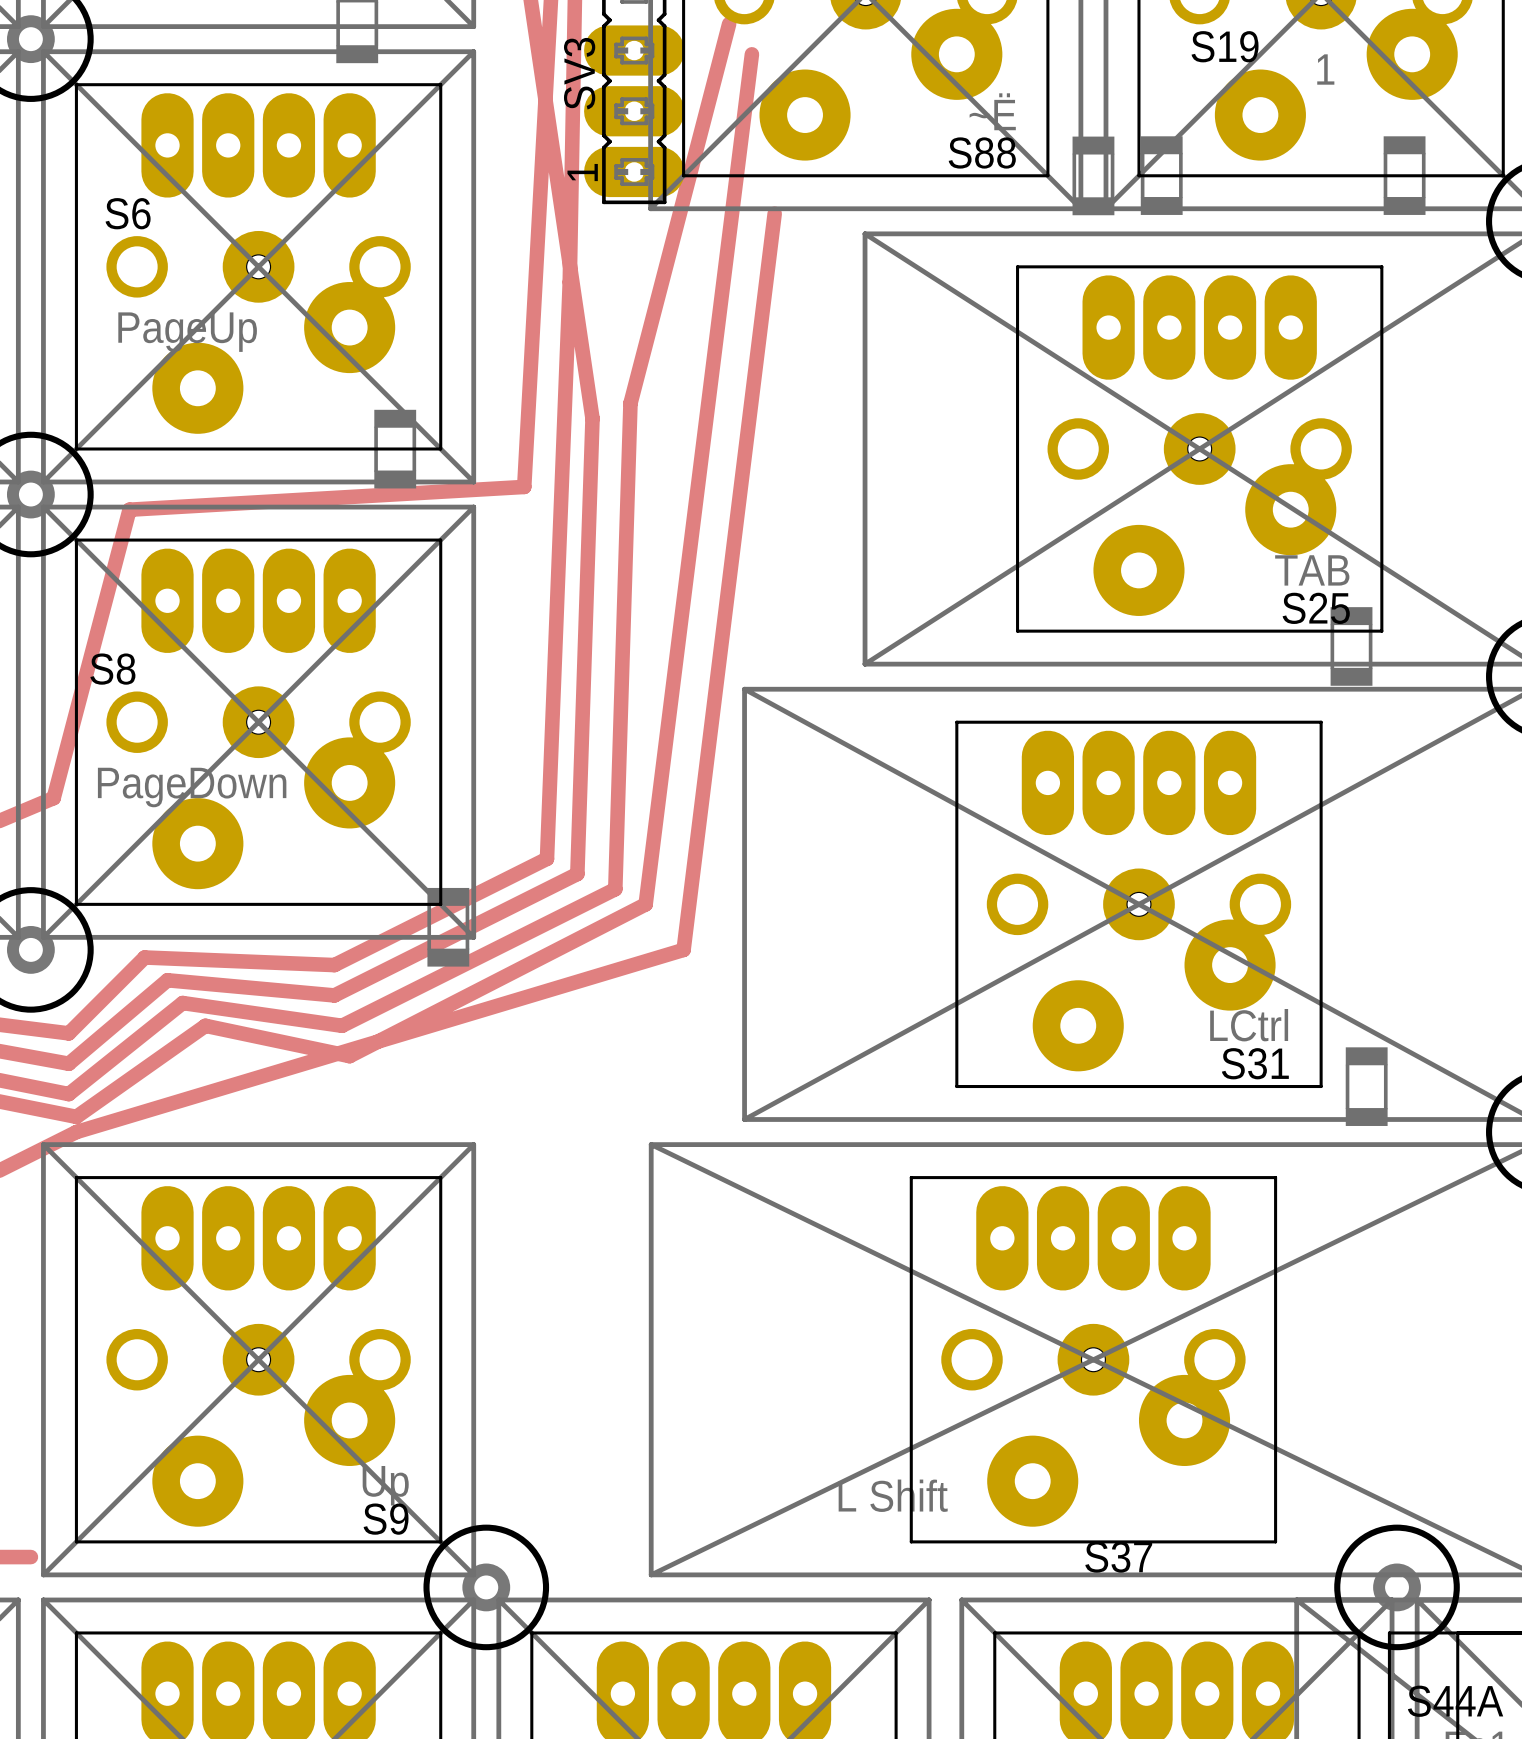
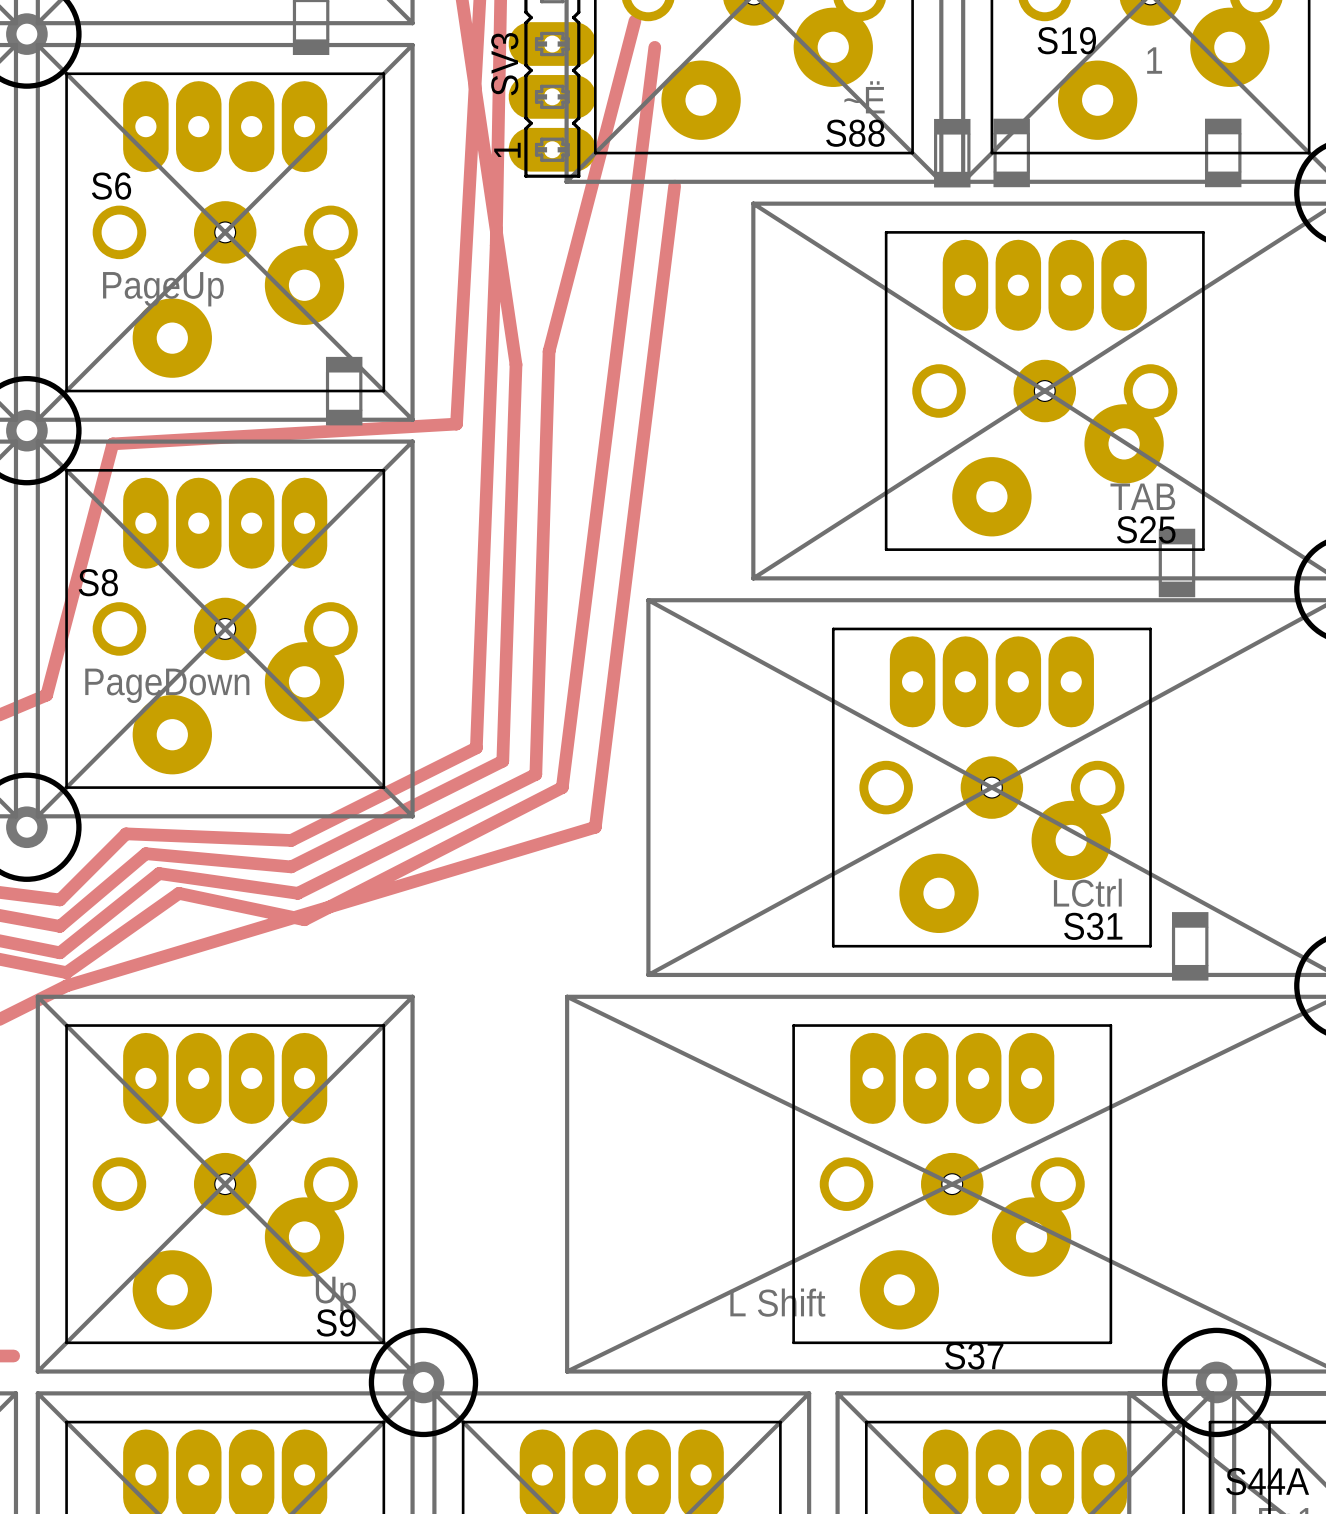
part: (448, 927) -> none
track: (15, 1557) (30, 1557) -> none

